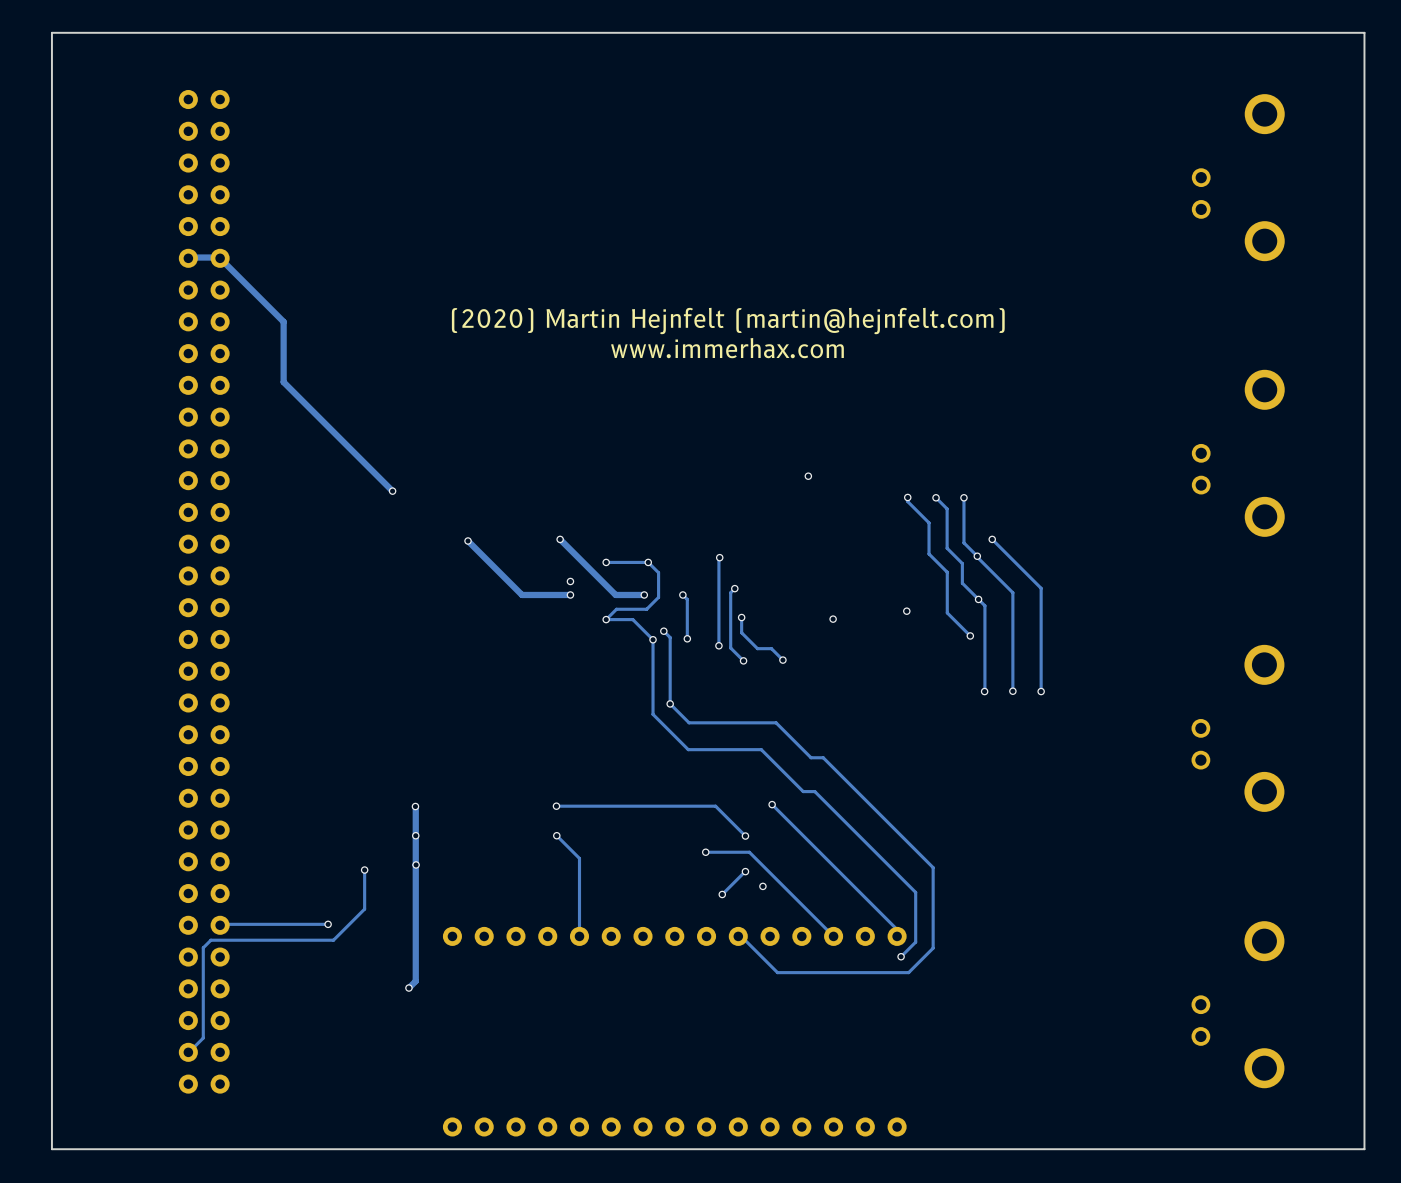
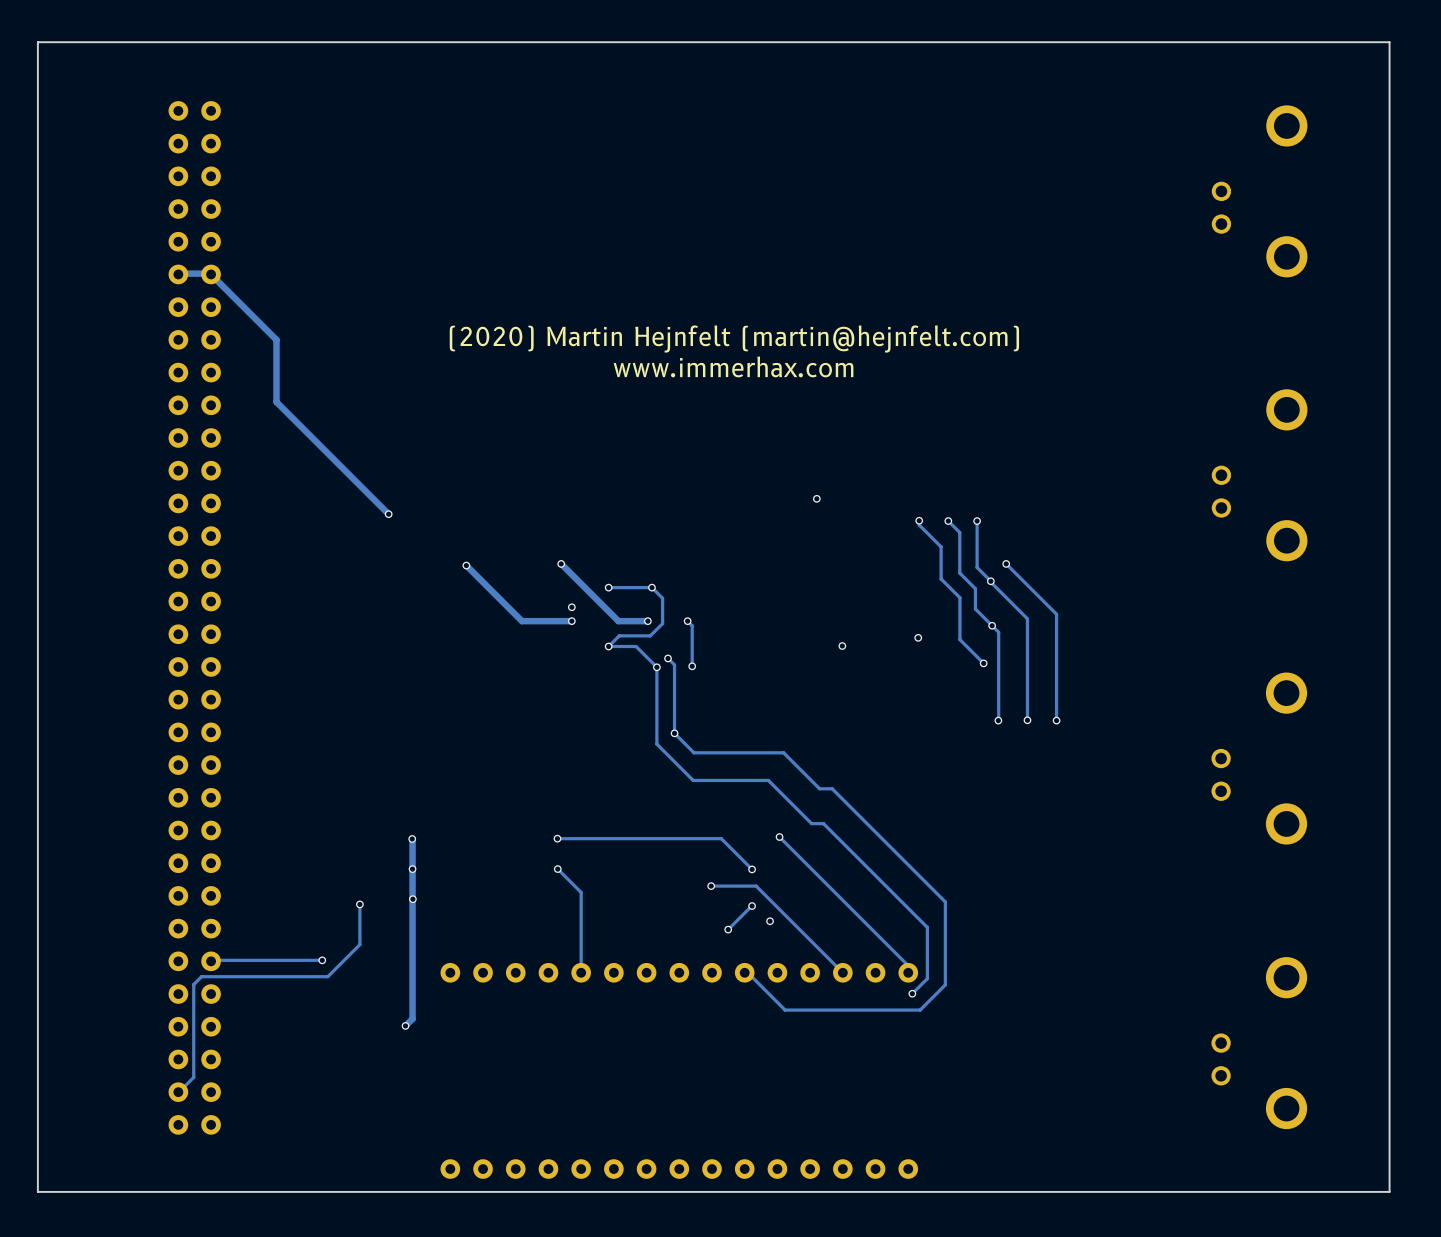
track: (719, 557) (718, 645) -> none
via: (719, 557) -> none
track: (734, 588) (730, 592) (730, 648) (743, 660) -> none
via: (734, 588) -> none
track: (741, 617) (741, 632) (757, 648) (771, 648) (782, 660) -> none
via: (741, 617) -> none
via: (718, 645) -> none
via: (743, 660) -> none
via: (782, 660) -> none

